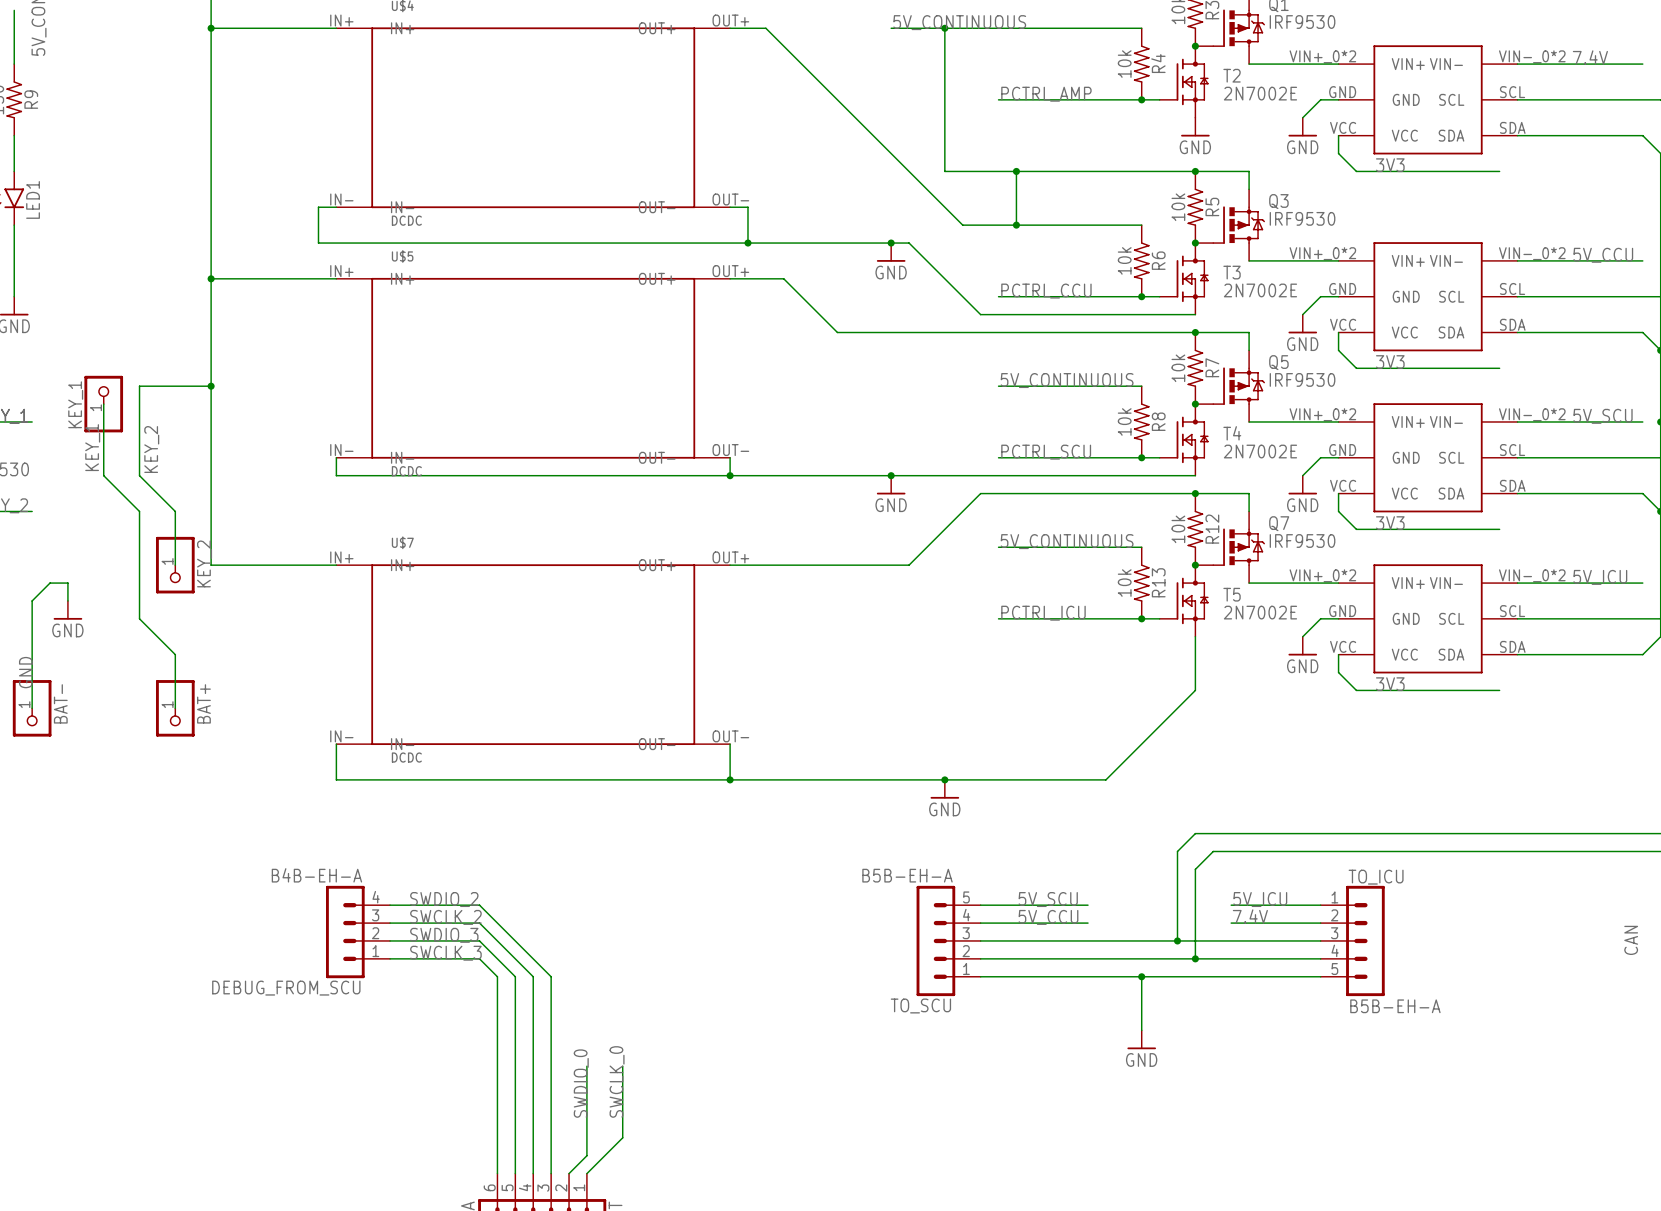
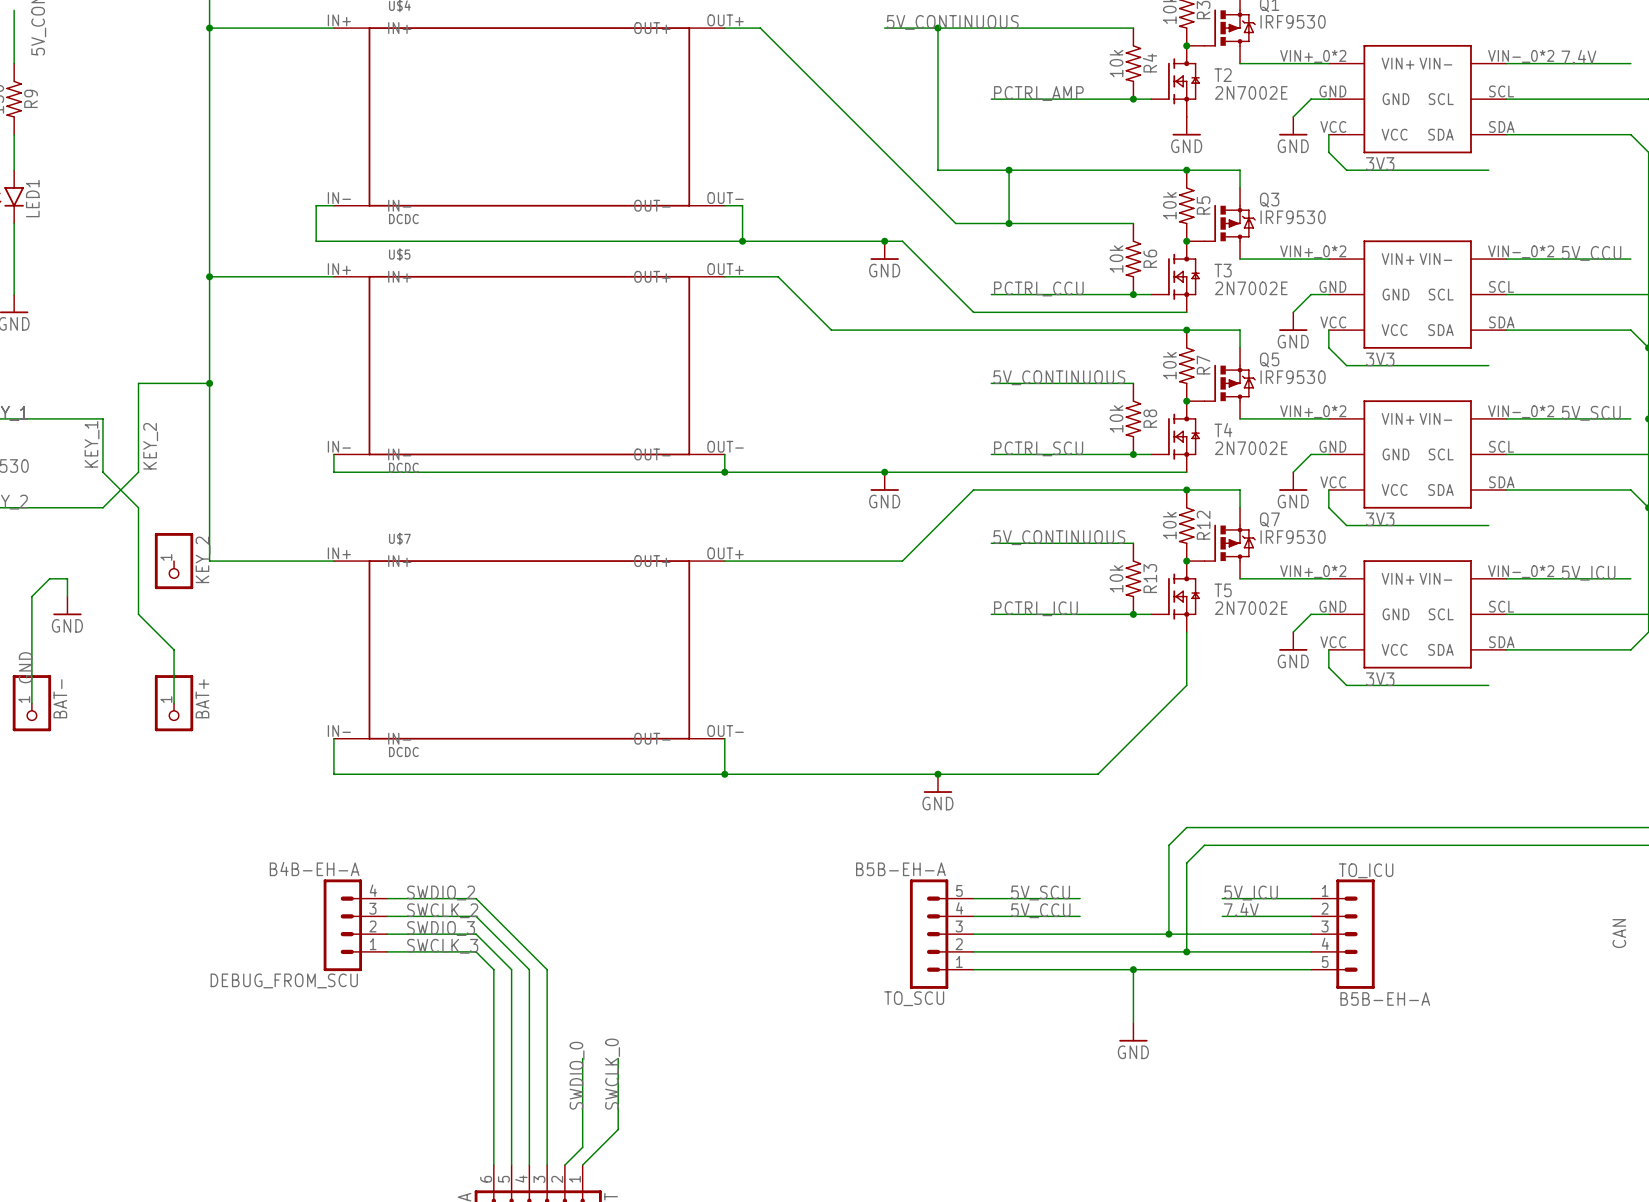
wire: (103, 404) (103, 421) -> (31, 418) (102, 418)
KEY_1: (103, 404) -> none
wire: (139, 475) (175, 511) (175, 565) -> (138, 472) (102, 507) (31, 507)

